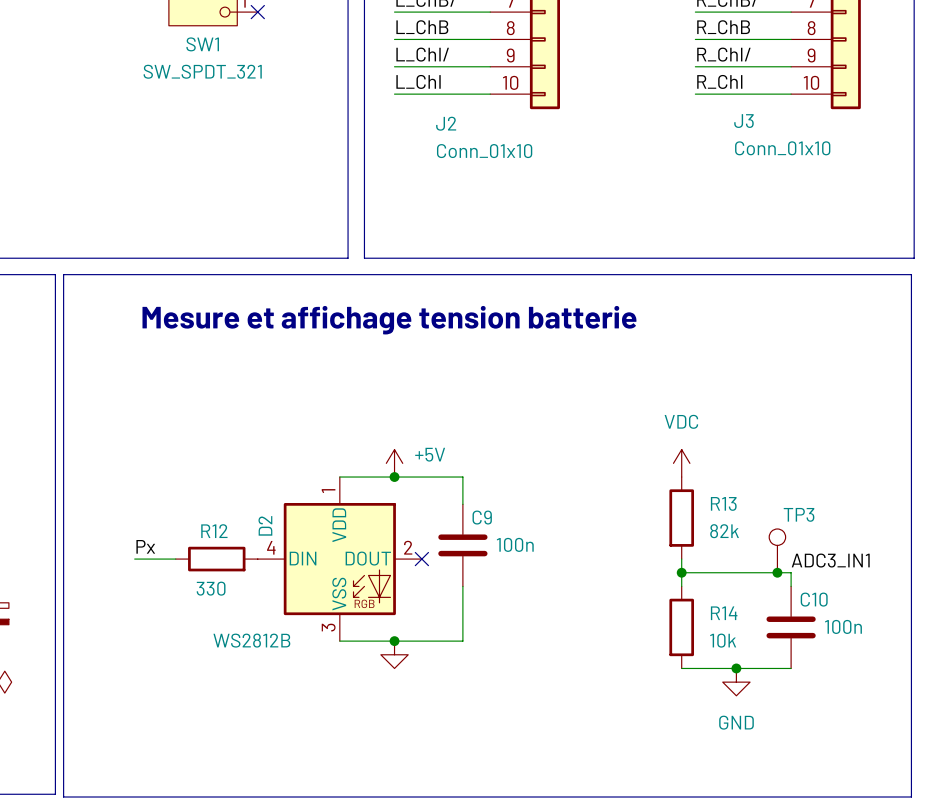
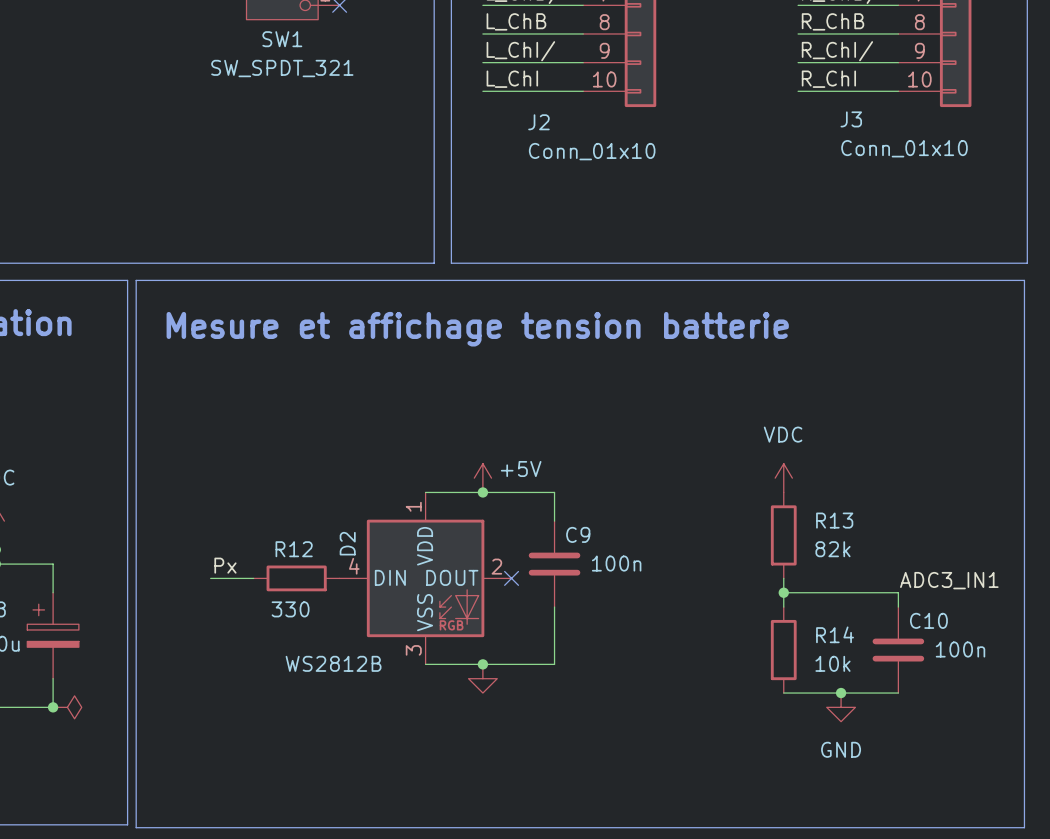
TP3: (777, 550) -> none
junction: (777, 572) -> none

